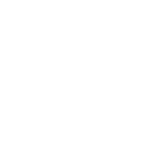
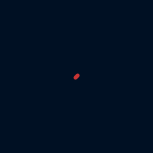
top track: none -> (77, 75) (75, 77)

